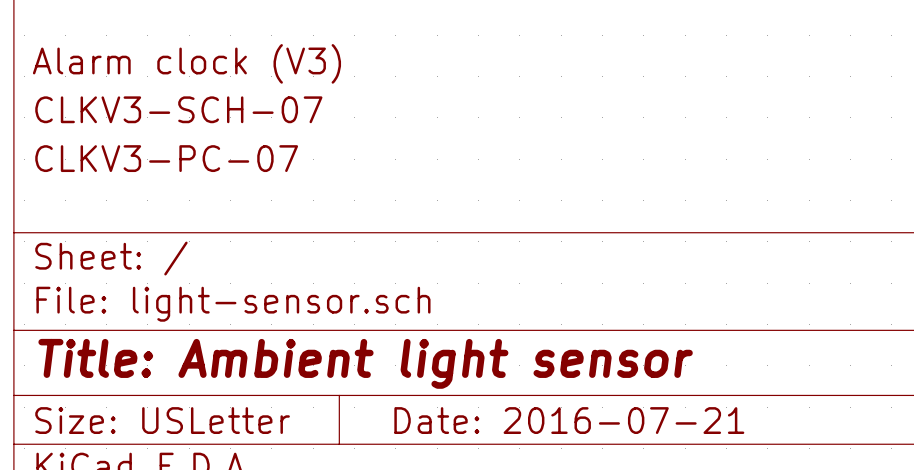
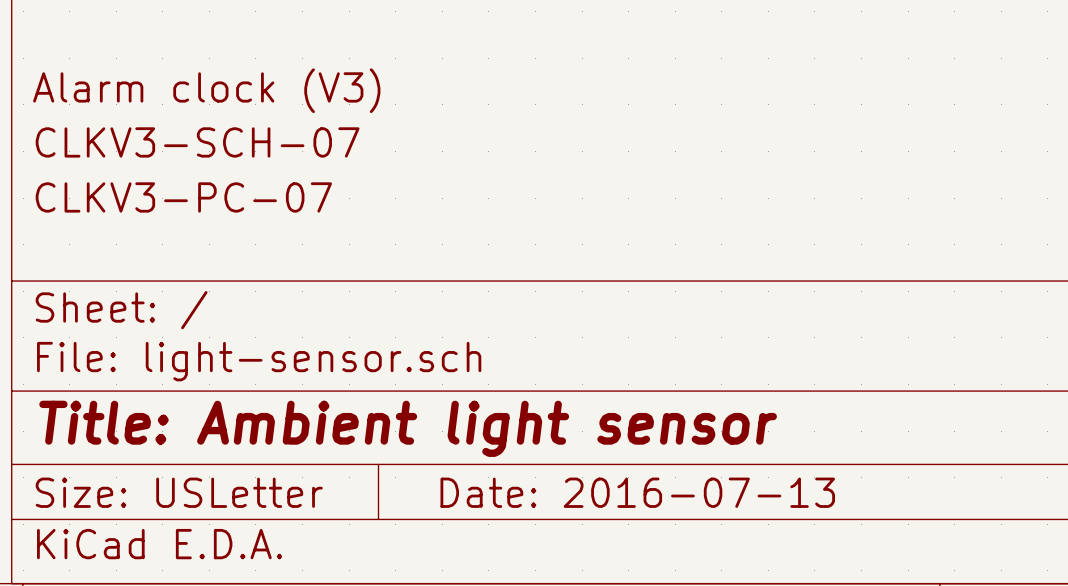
title block: Date: 2016-07-21 (569, 420) -> Date: 2016-07-13 (637, 492)

